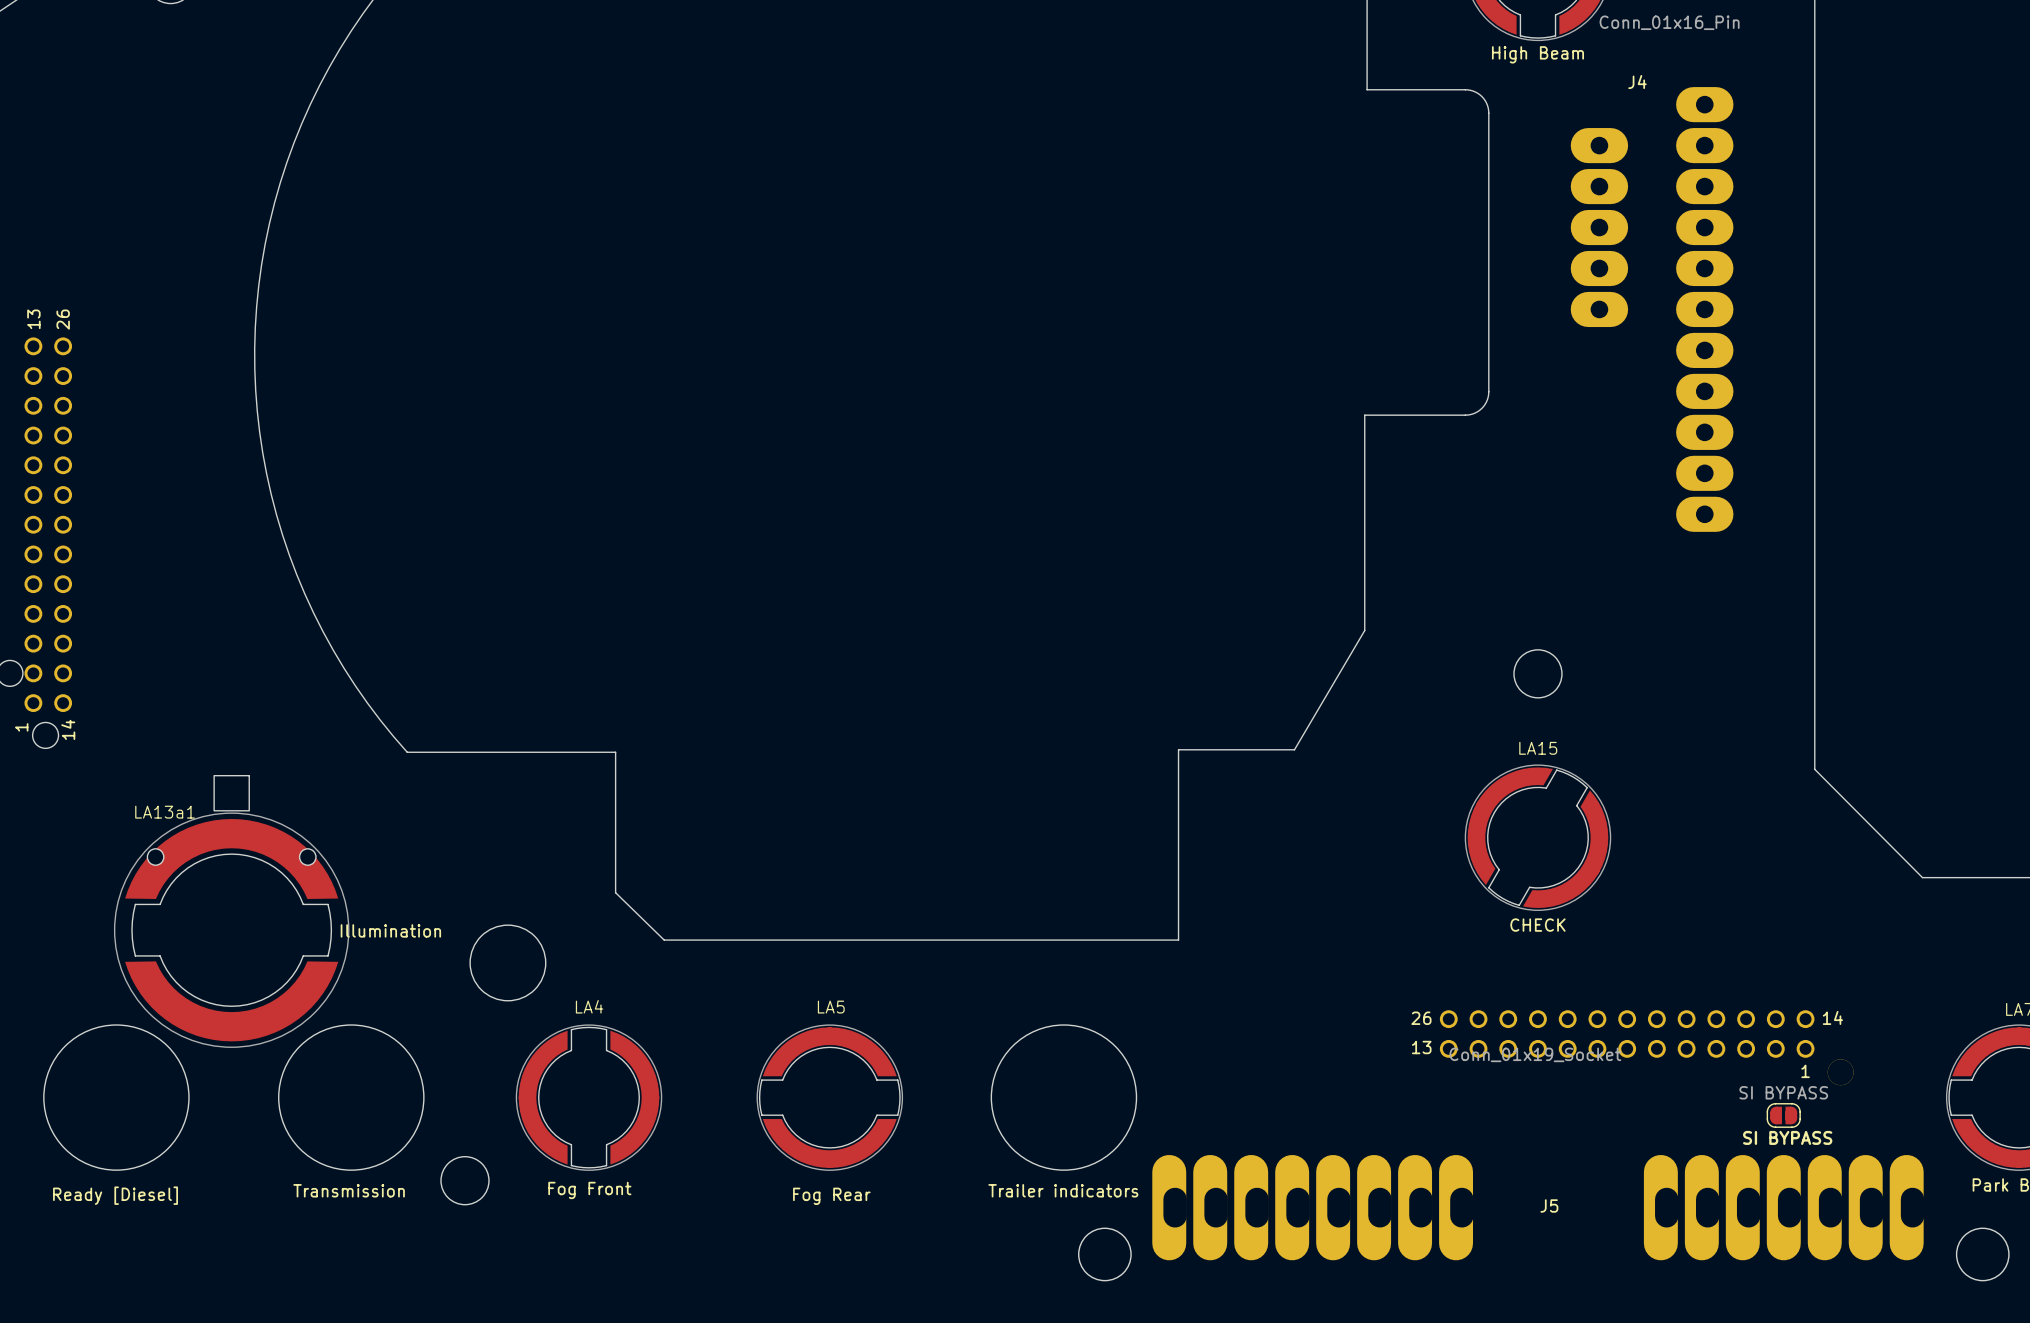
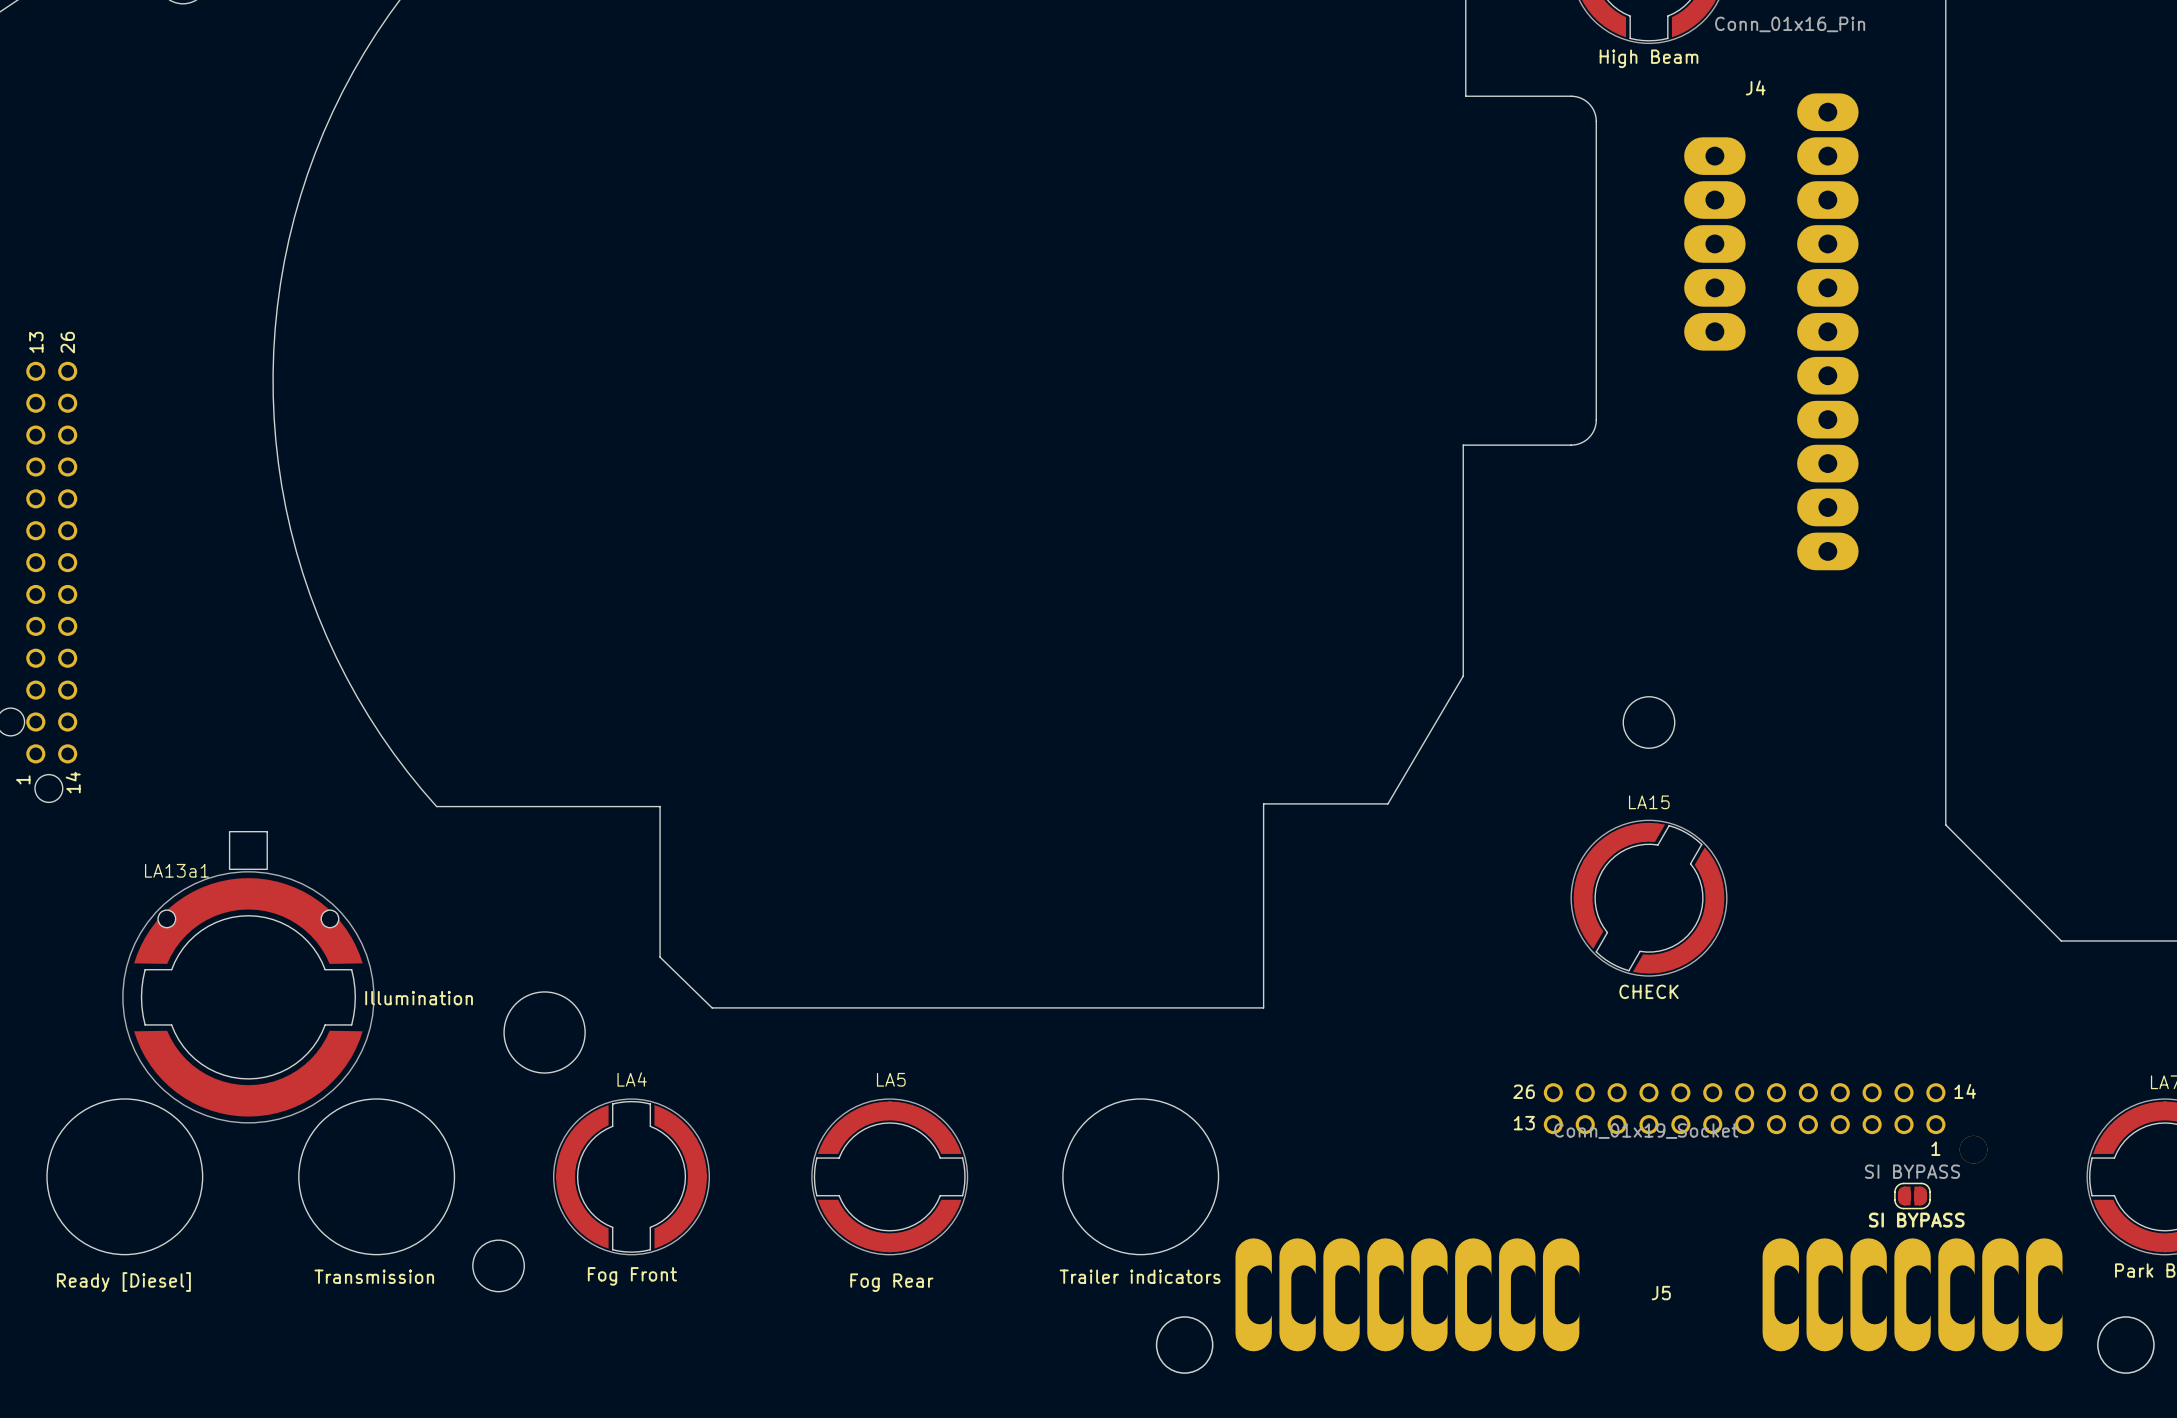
J5 footprint: [1078, 1154, 2010, 1282] -> [1155, 1238, 2155, 1374]

